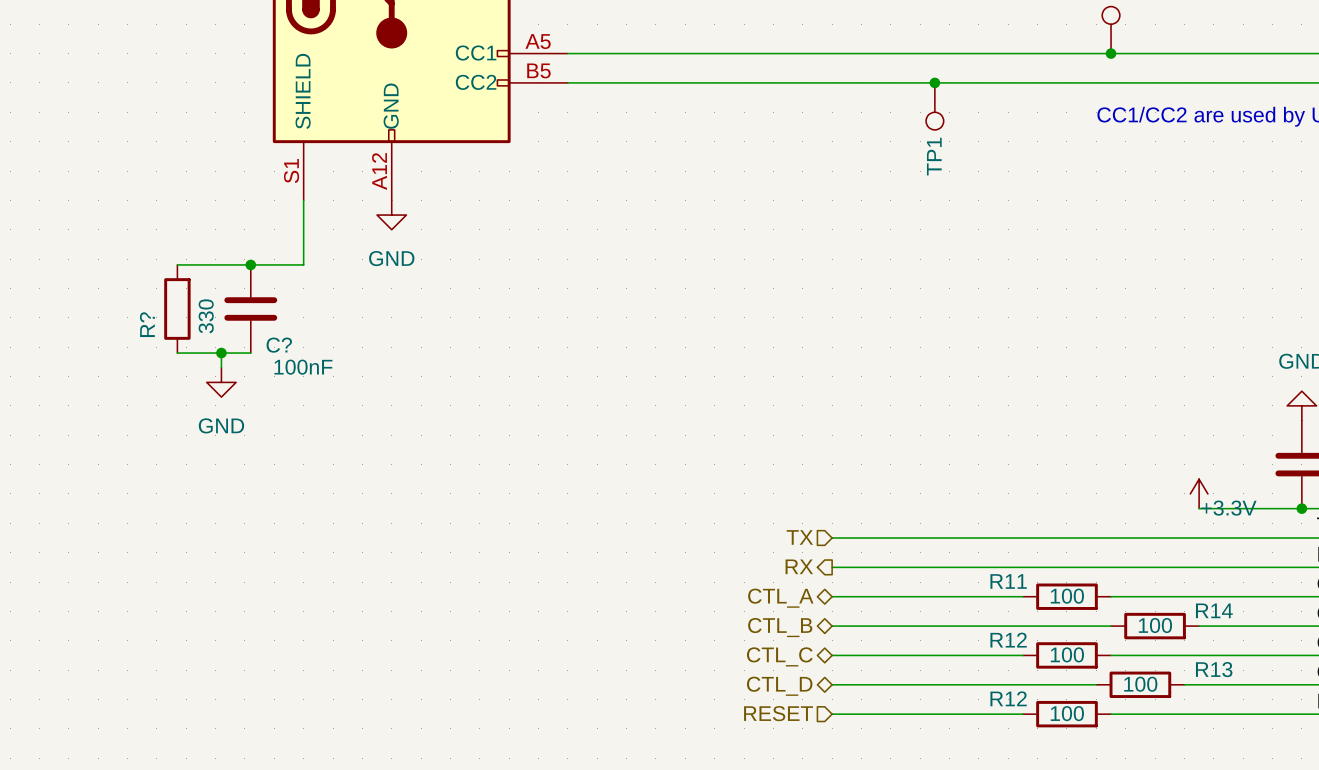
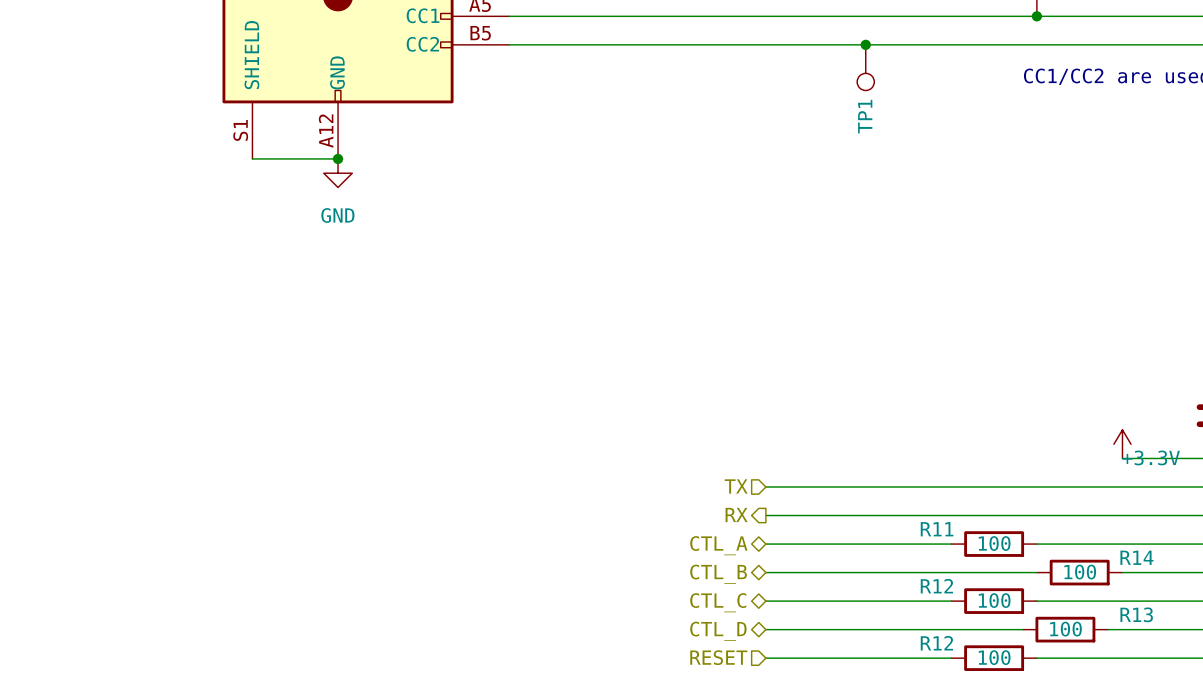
wire: (303, 200) (303, 264) (177, 264) -> (252, 158) (338, 158)
junction: none -> (338, 158)
junction: (250, 264) -> none
R?: 330 (177, 308) -> none
C?: 100nF (250, 308) -> none
wire: (177, 353) (250, 353) -> none
wire: (221, 353) (221, 367) -> none
junction: (221, 353) -> none
power symbol: GND (221, 382) -> none

